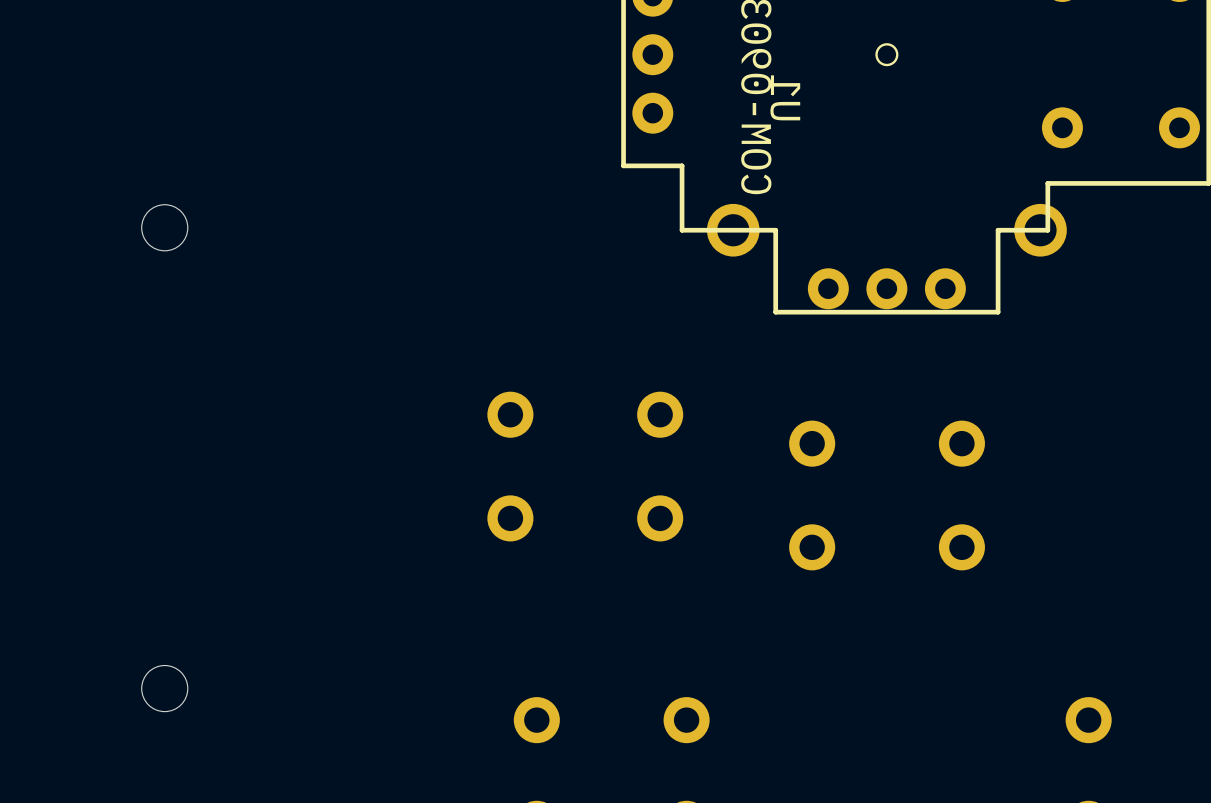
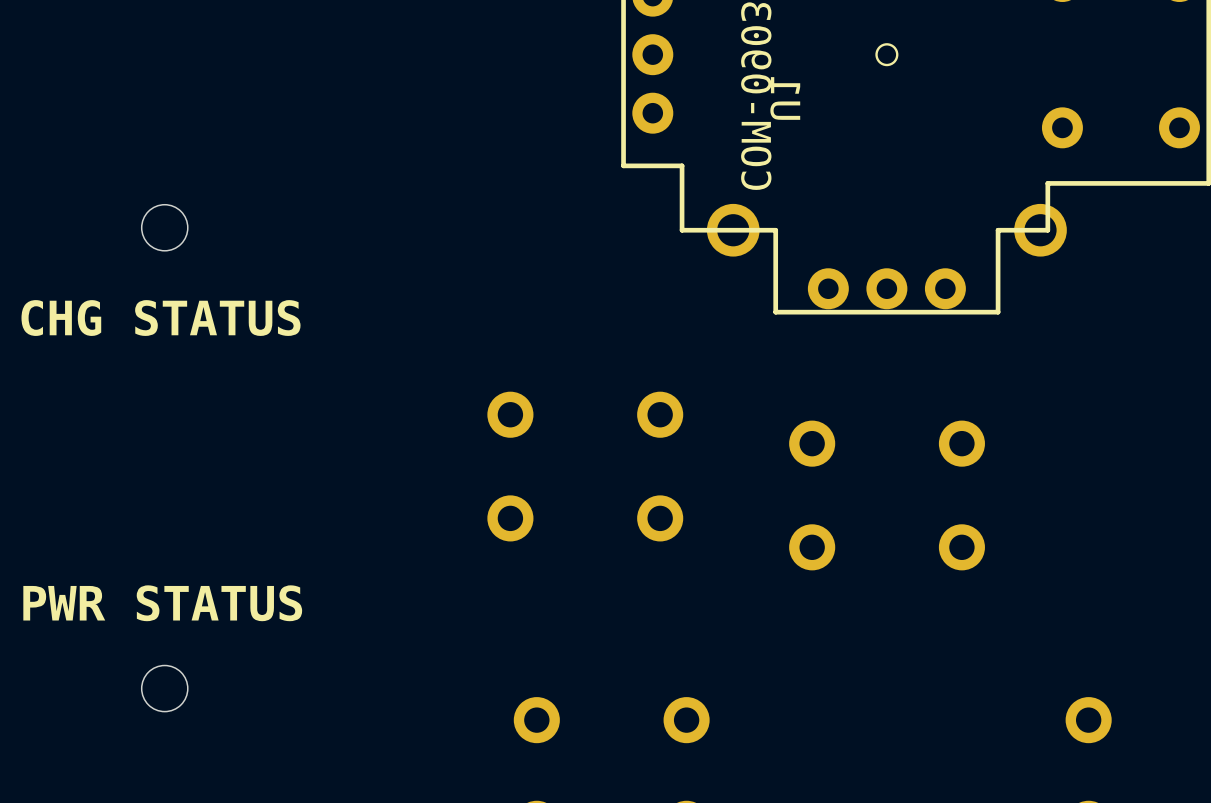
text: none -> CHG STATUS (161, 318)
text: none -> PWR STATUS (162, 603)

